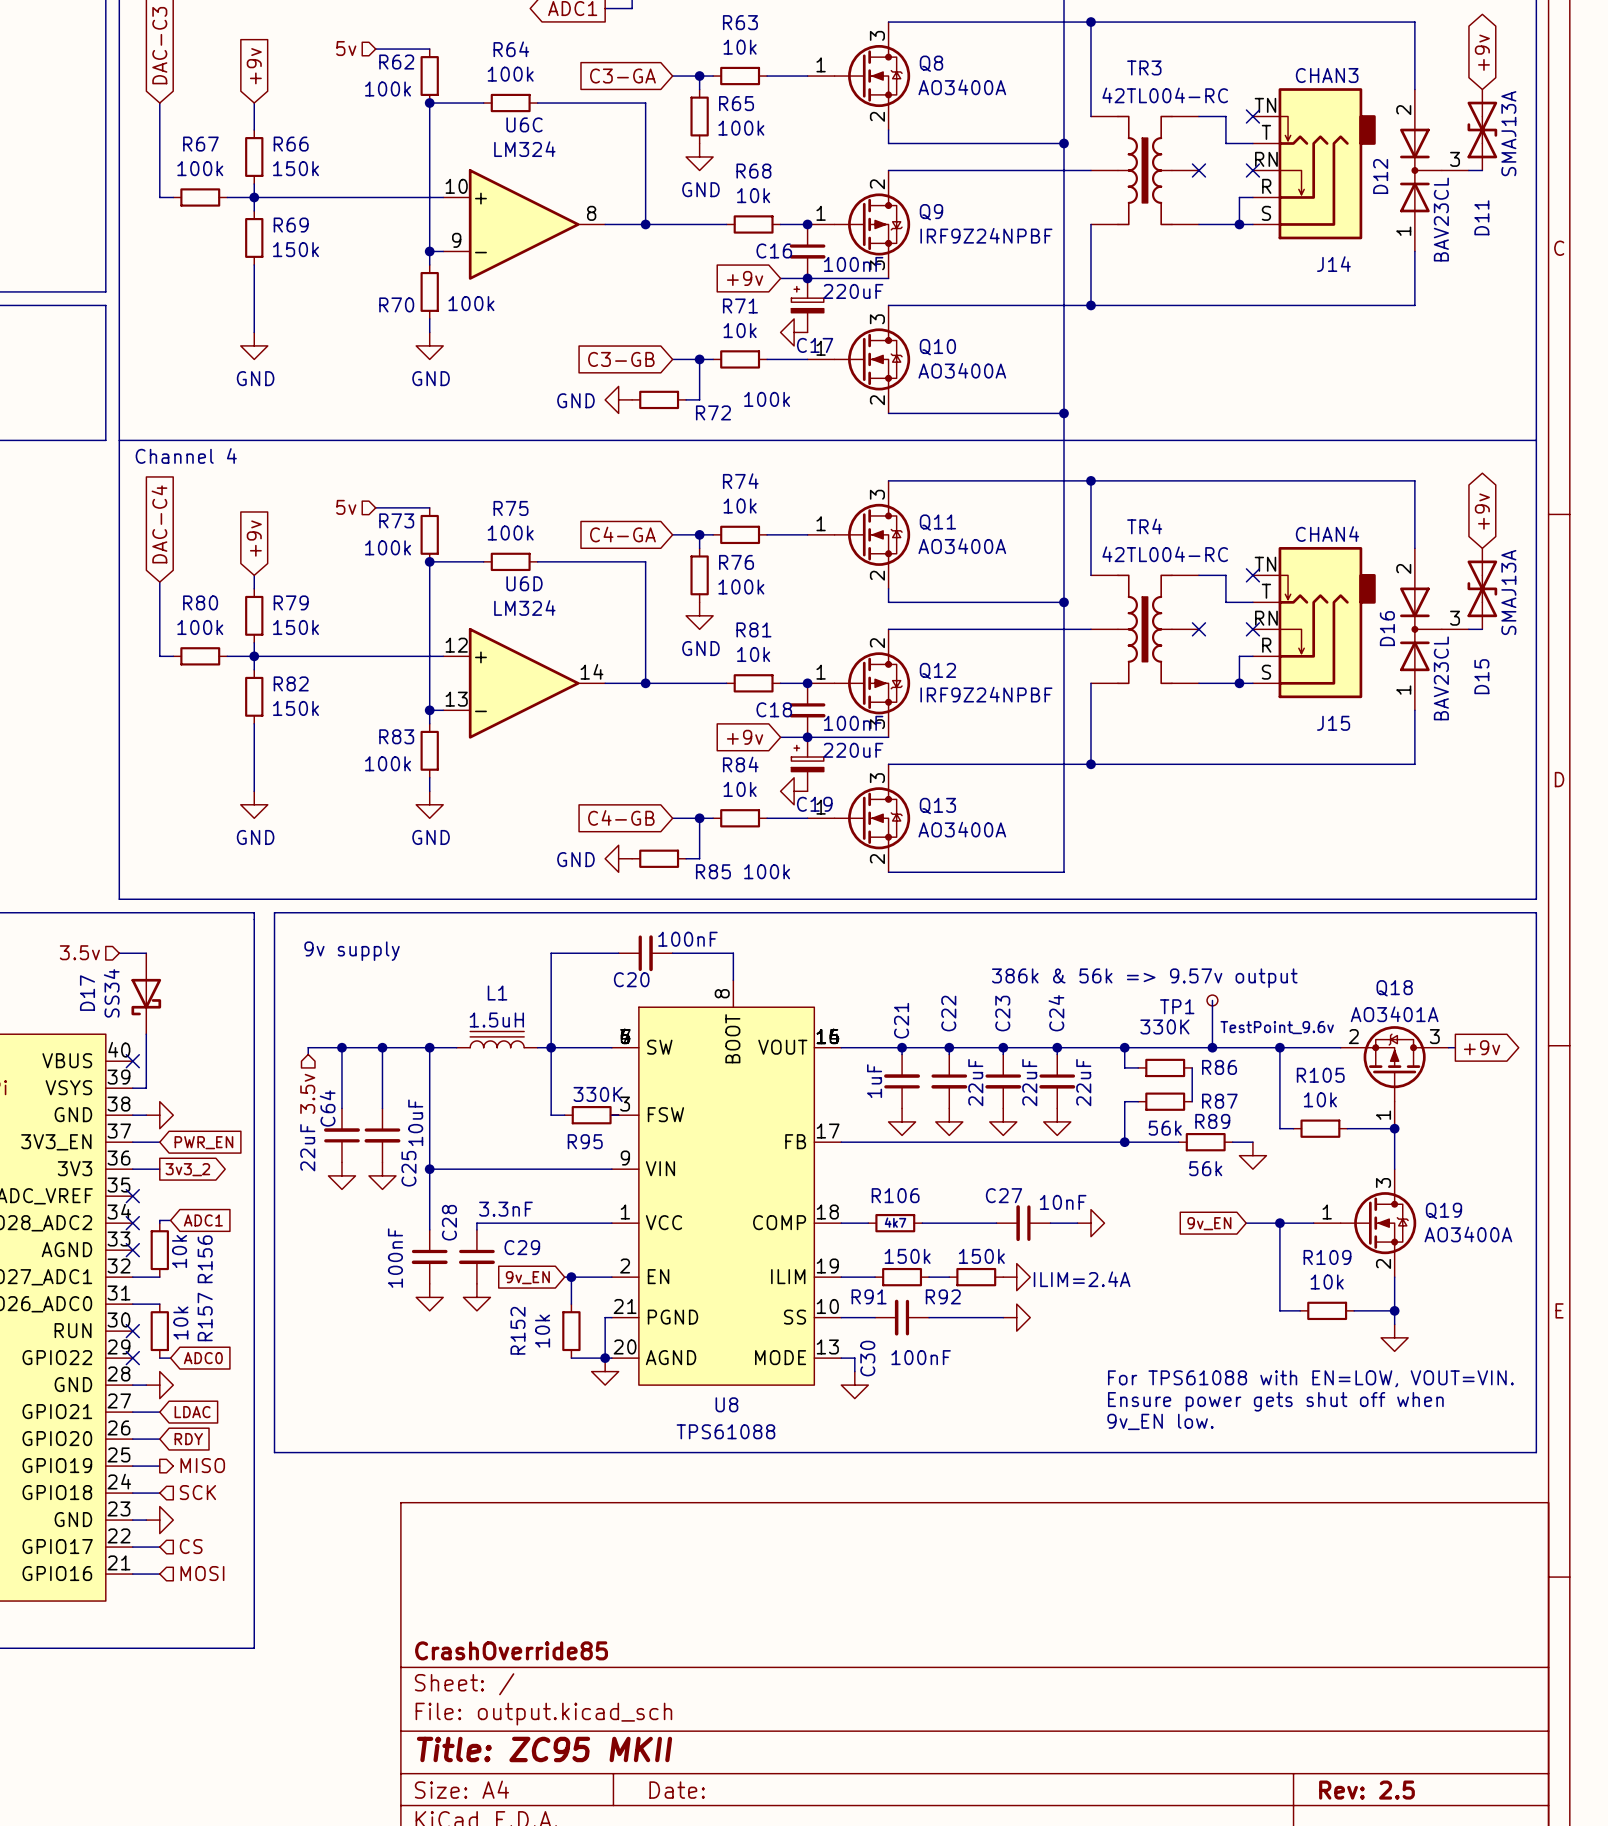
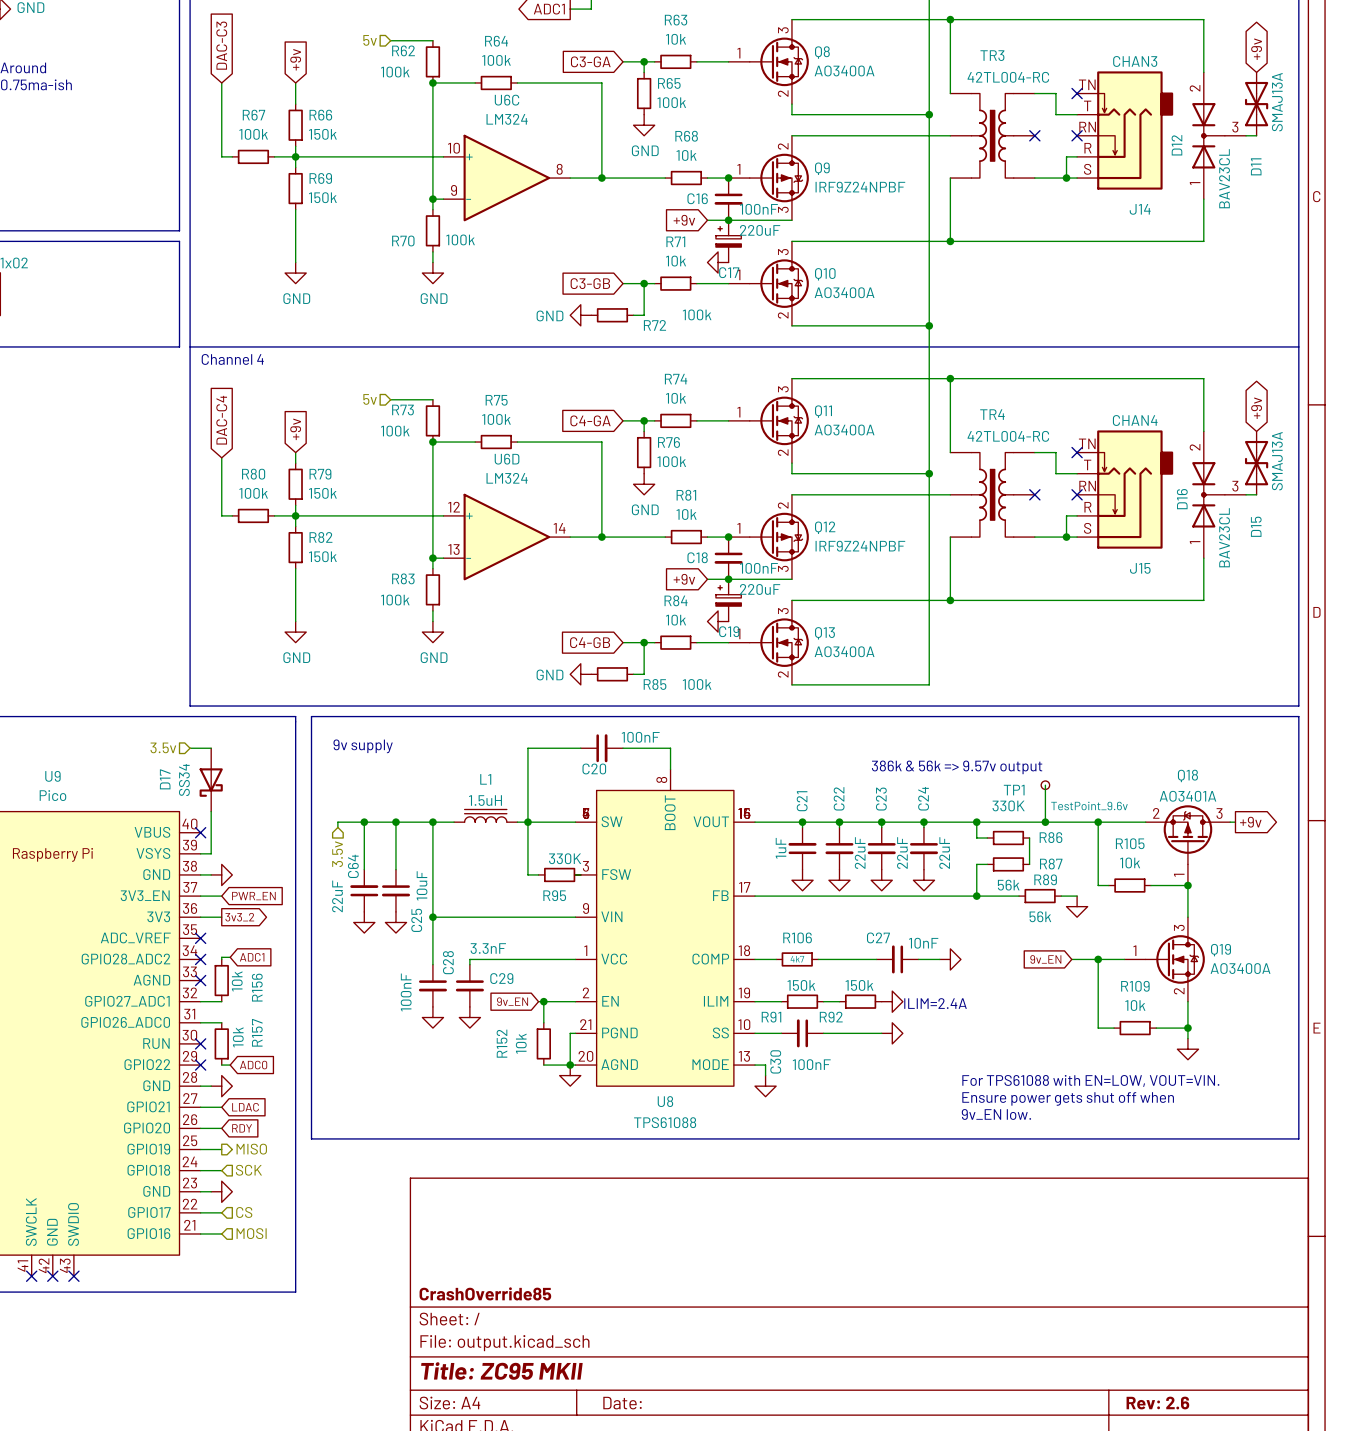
title block: Rev: 2.5 (1366, 1790) -> Rev: 2.6 (1157, 1403)

